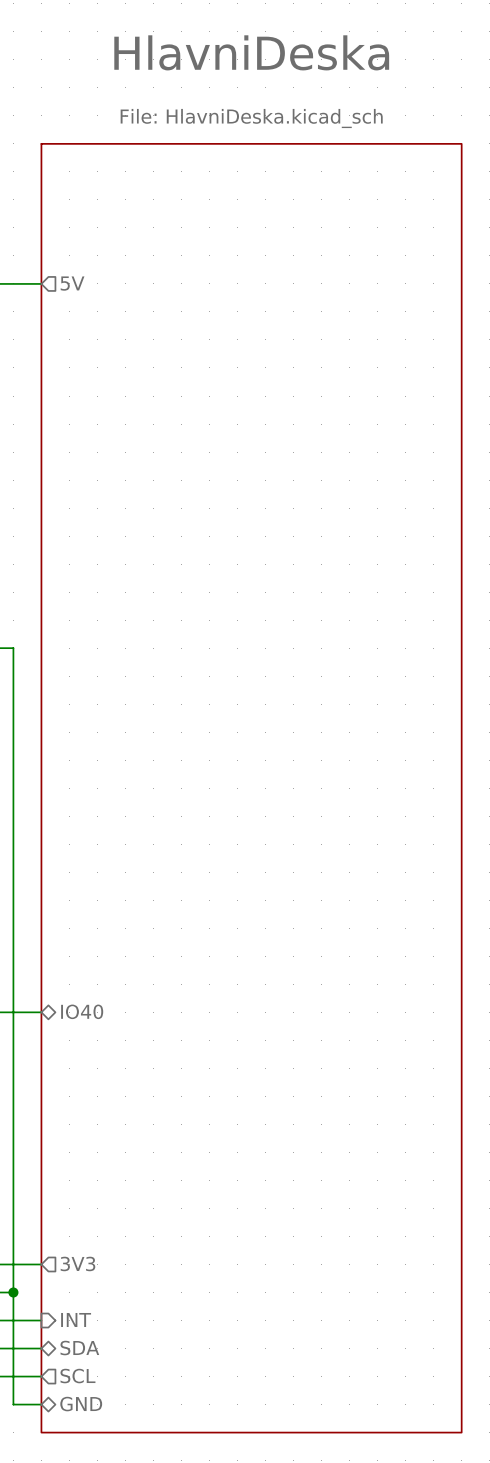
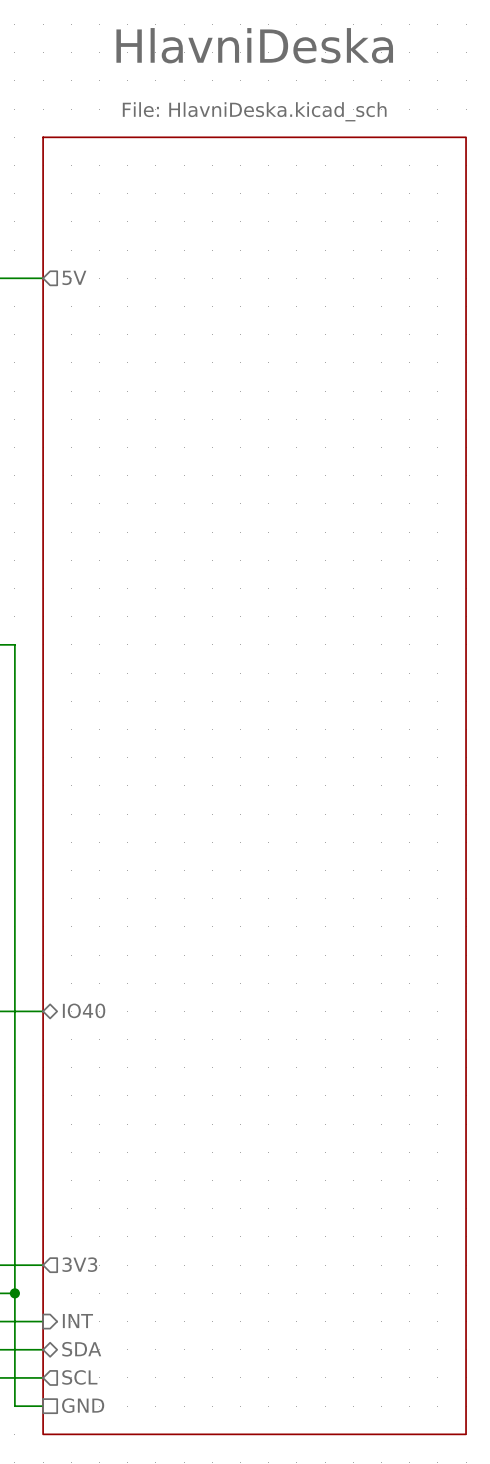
sheet pin shape: bidirectional (81, 1404) -> passive (83, 1405)

